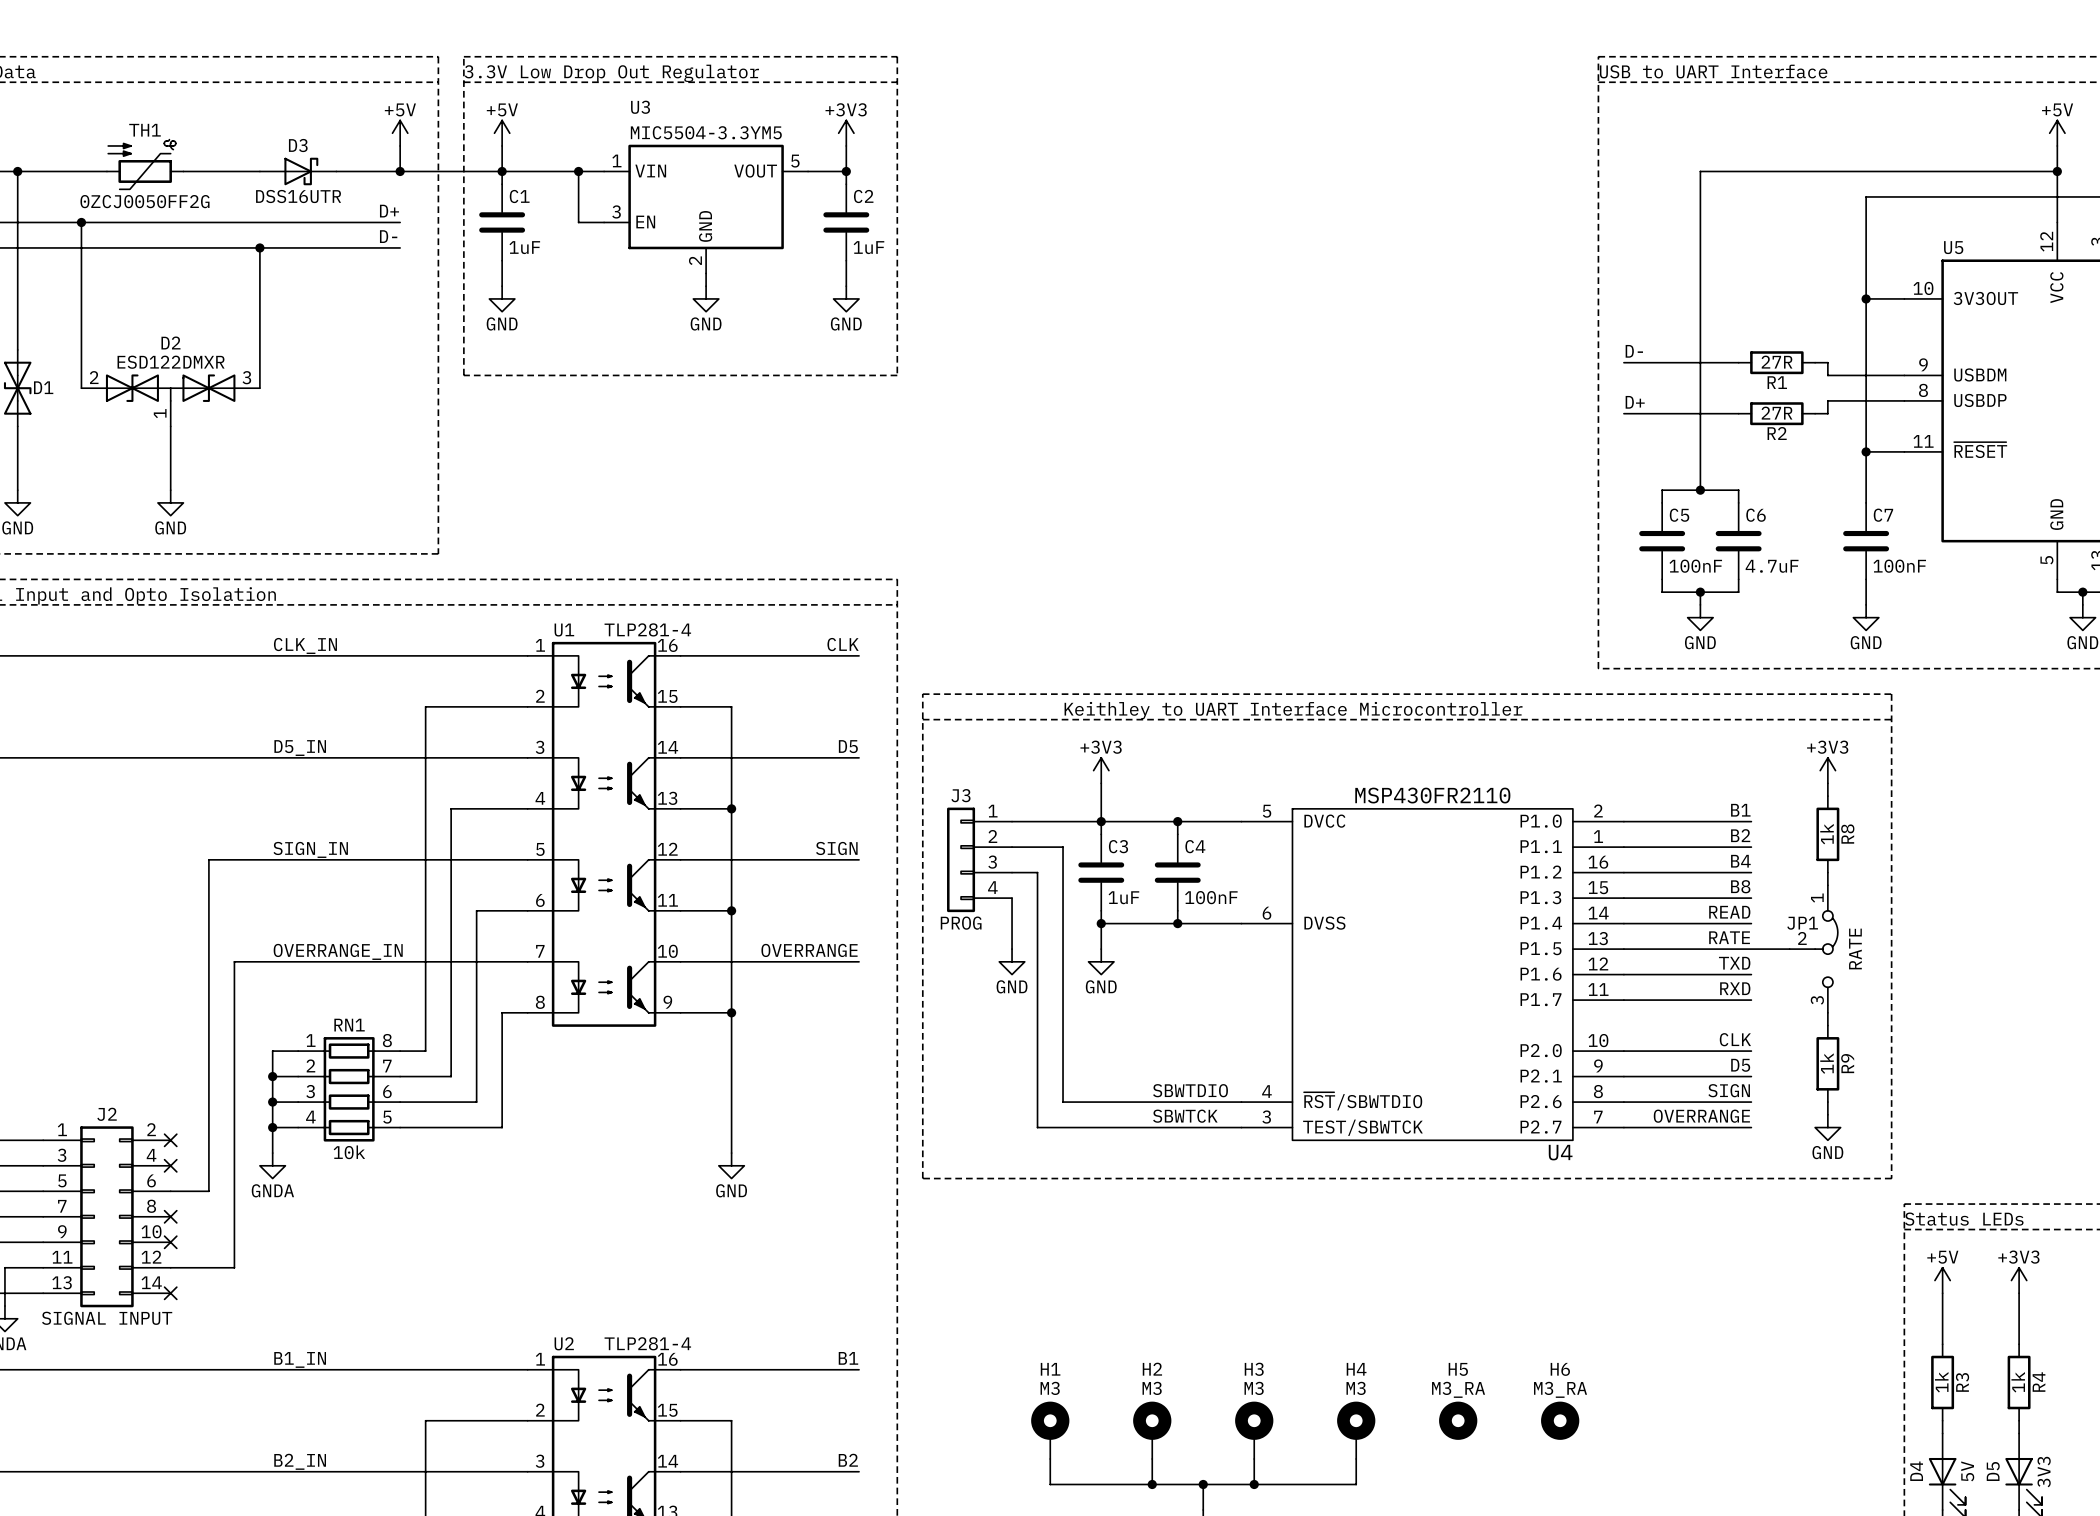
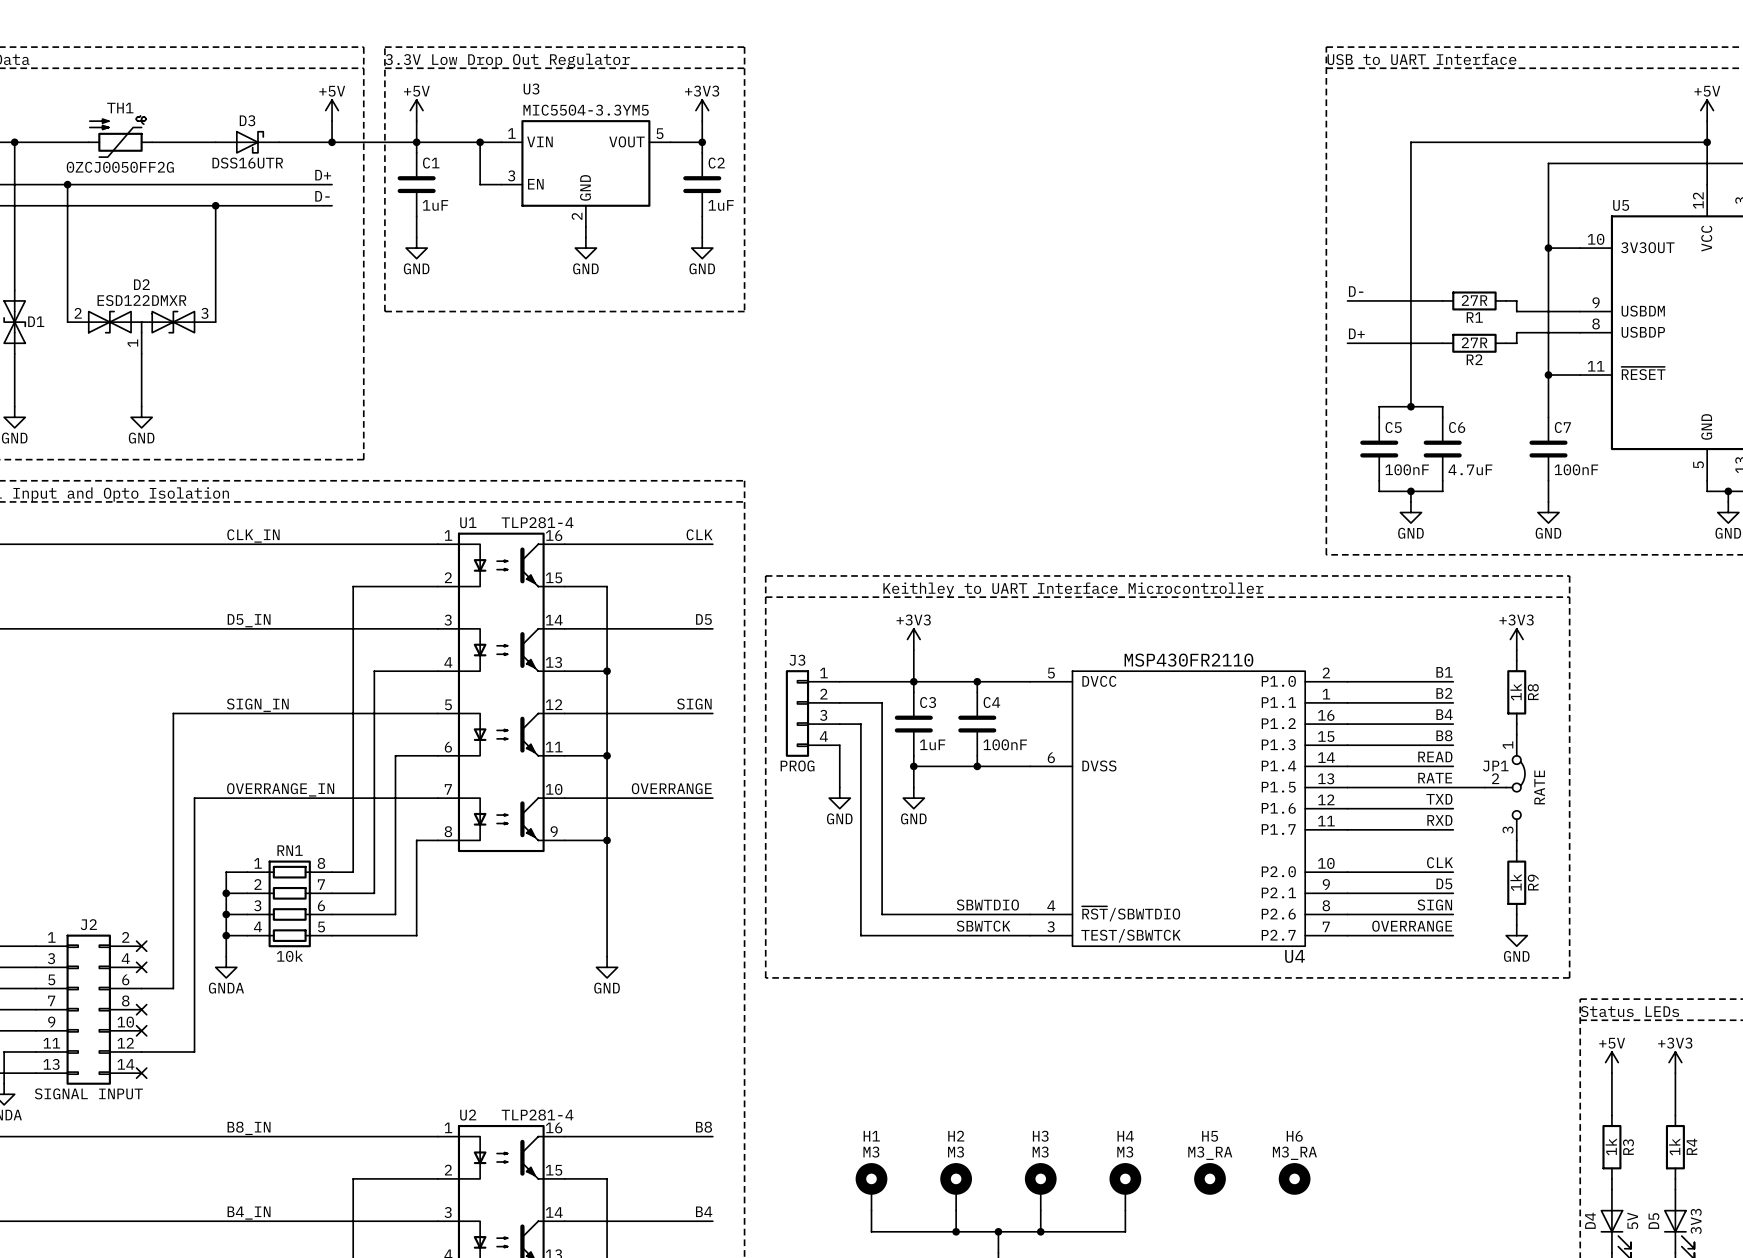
label: B1 (848, 1358) -> B8 (703, 1127)
label: B1_IN (300, 1359) -> B8_IN (249, 1128)
label: B2 (848, 1460) -> B4 (704, 1211)
label: B2_IN (300, 1461) -> B4_IN (249, 1213)

